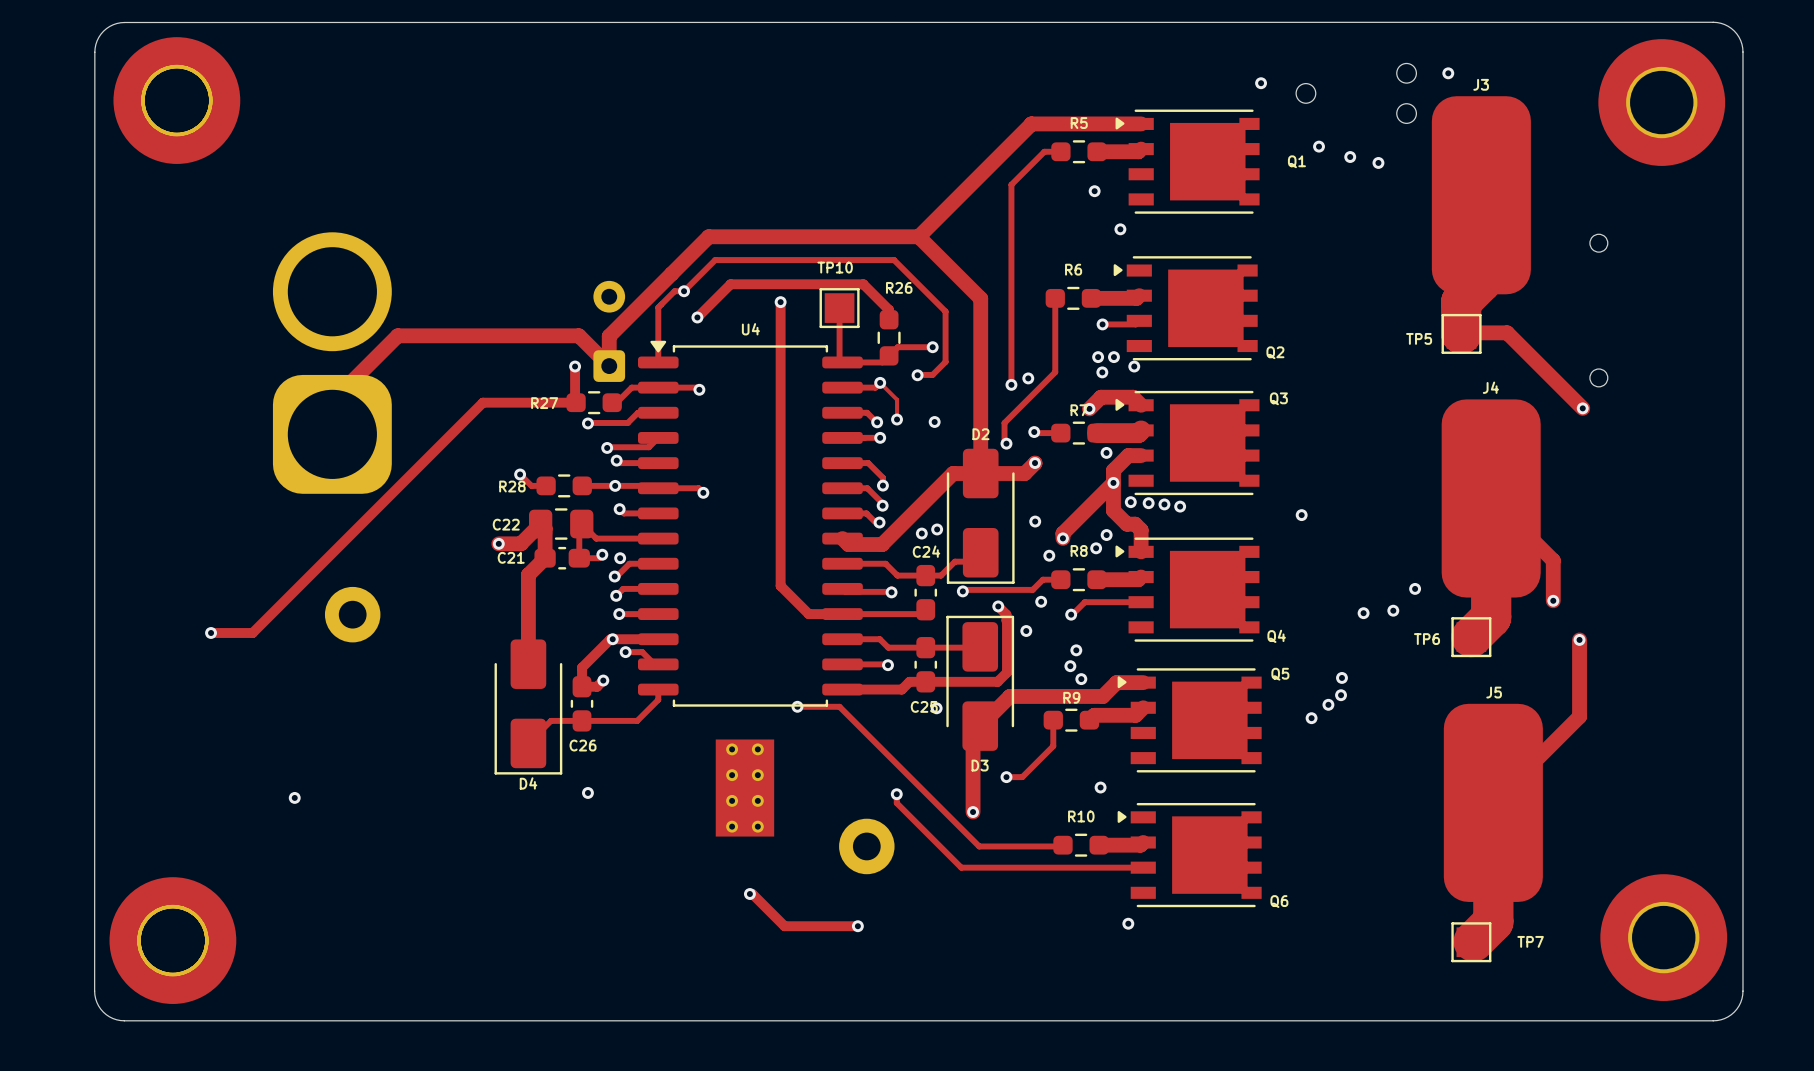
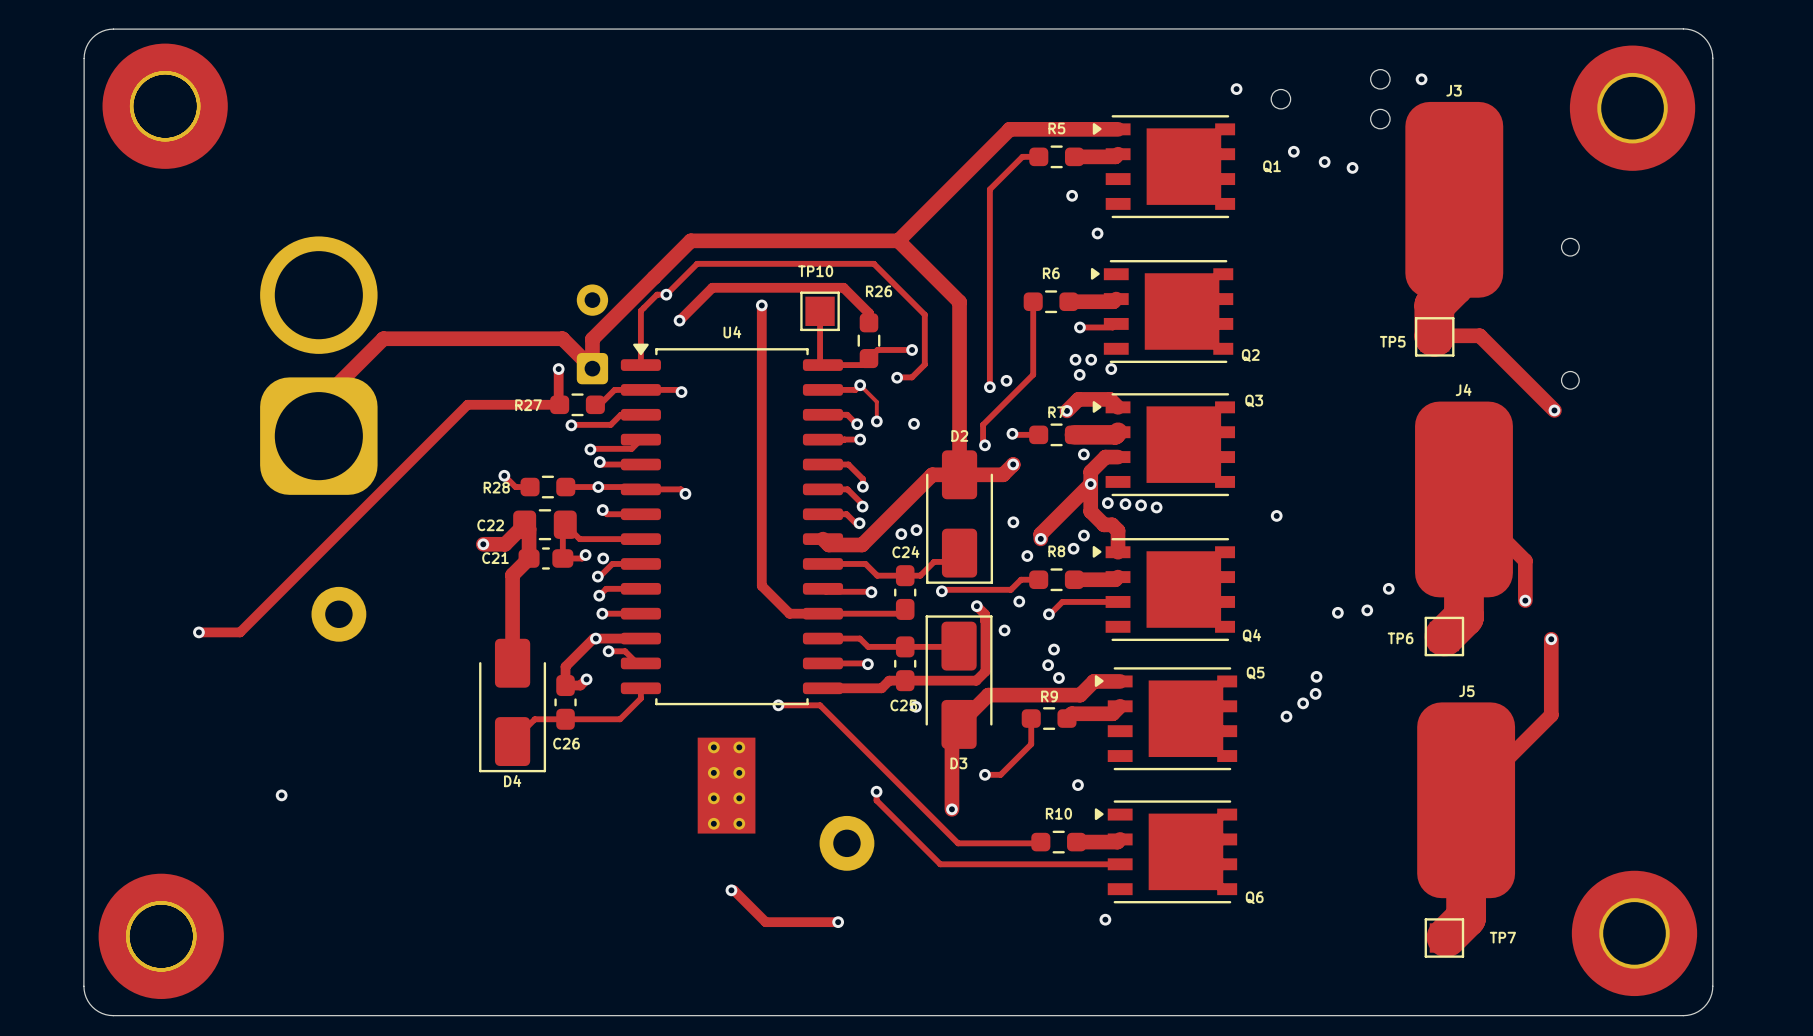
via: (587, 792) -> none

